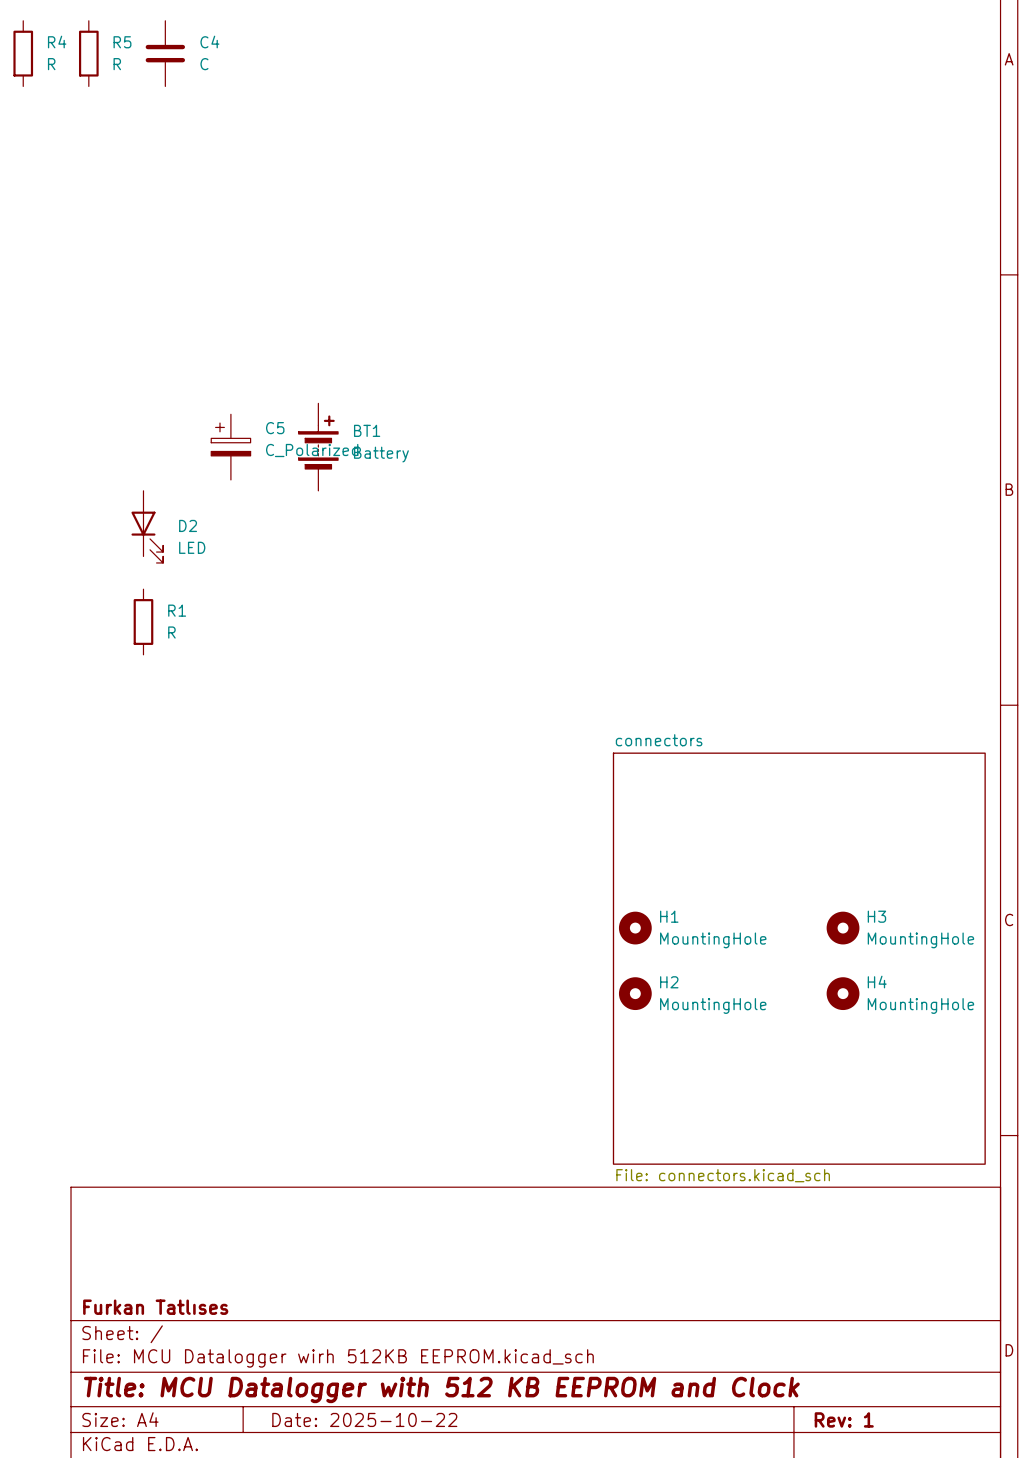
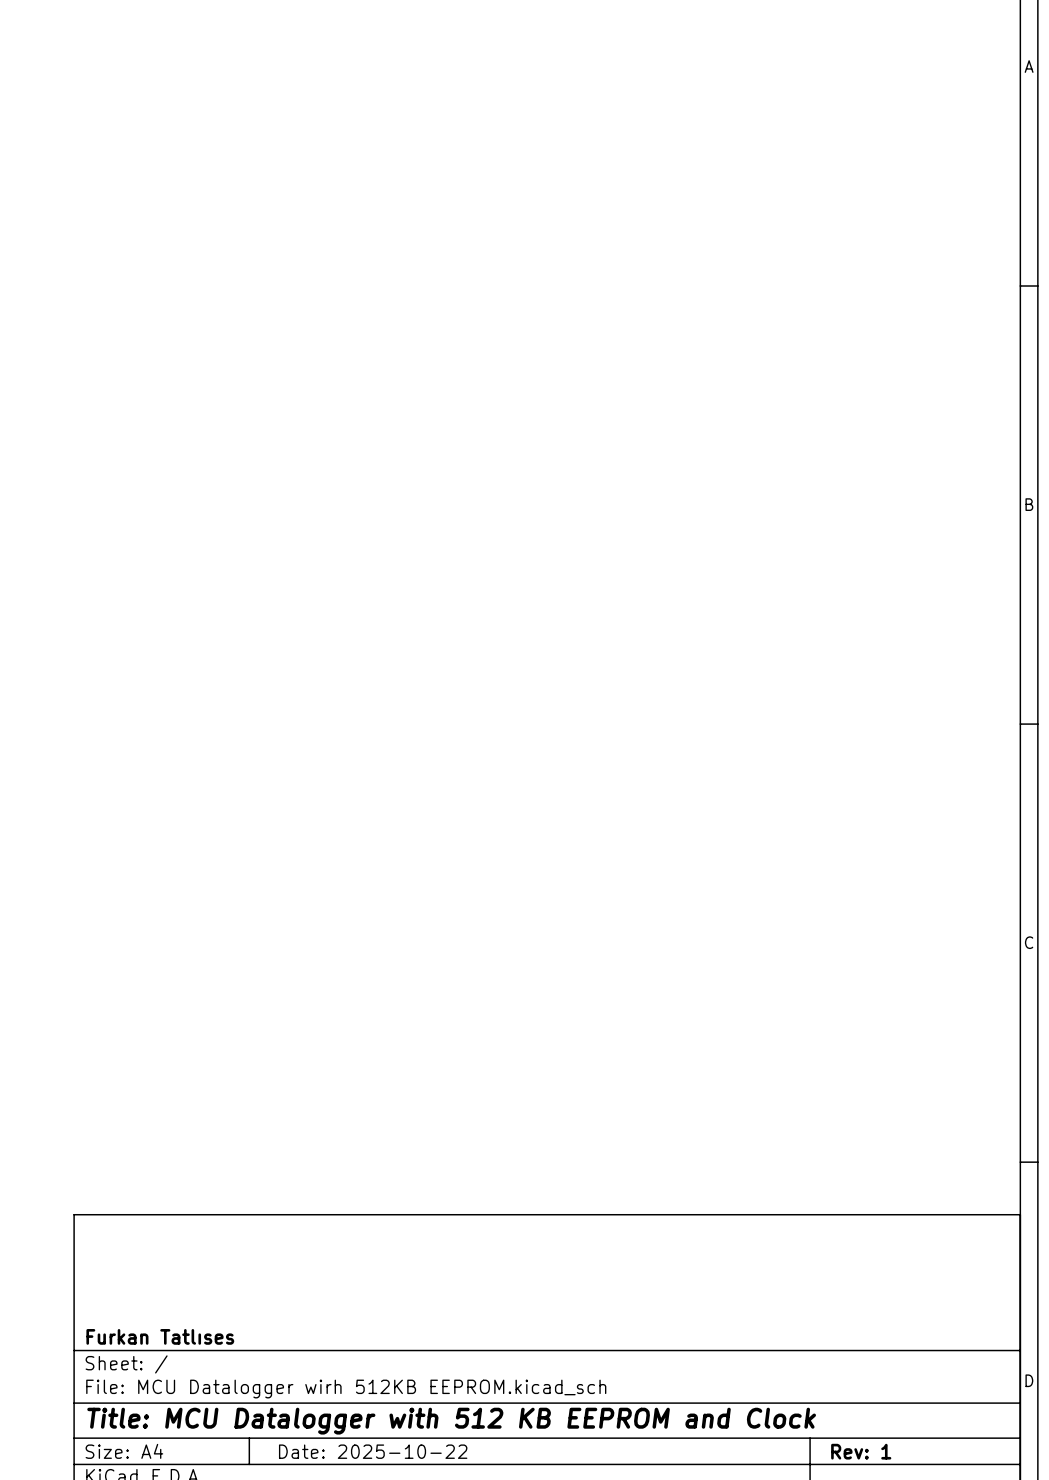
R4: R (23, 53) -> none
R5: R (88, 53) -> none
C4: C (165, 53) -> none
C5: C_Polarized (230, 447) -> none
BT1: Battery (318, 447) -> none
D2: LED (147, 526) -> none
R1: R (143, 622) -> none
H1: MountingHole (635, 928) -> none
H3: MountingHole (843, 928) -> none
sheet connectors: File: connectors.kicad_sch (799, 958) -> none
H2: MountingHole (635, 993) -> none
H4: MountingHole (843, 993) -> none

